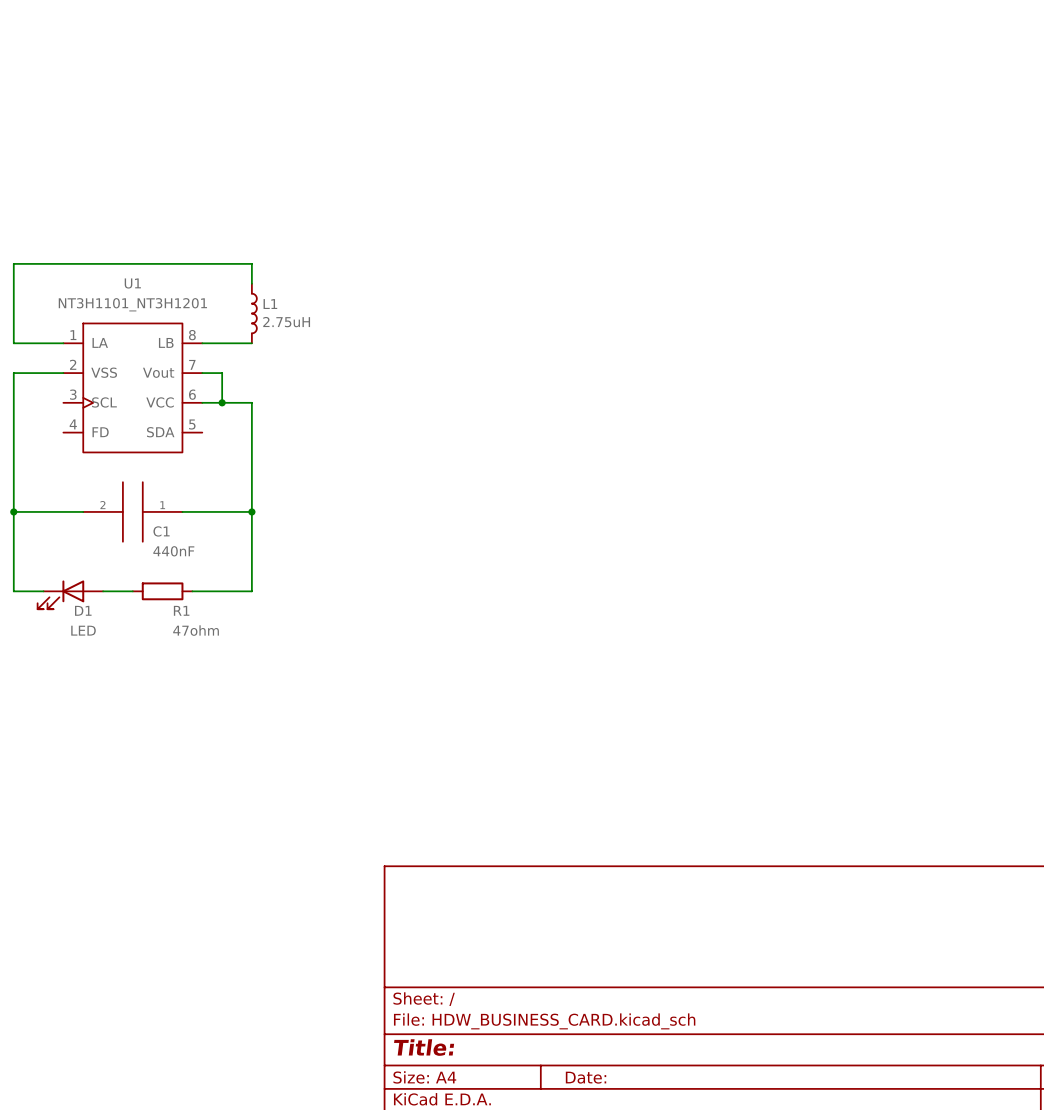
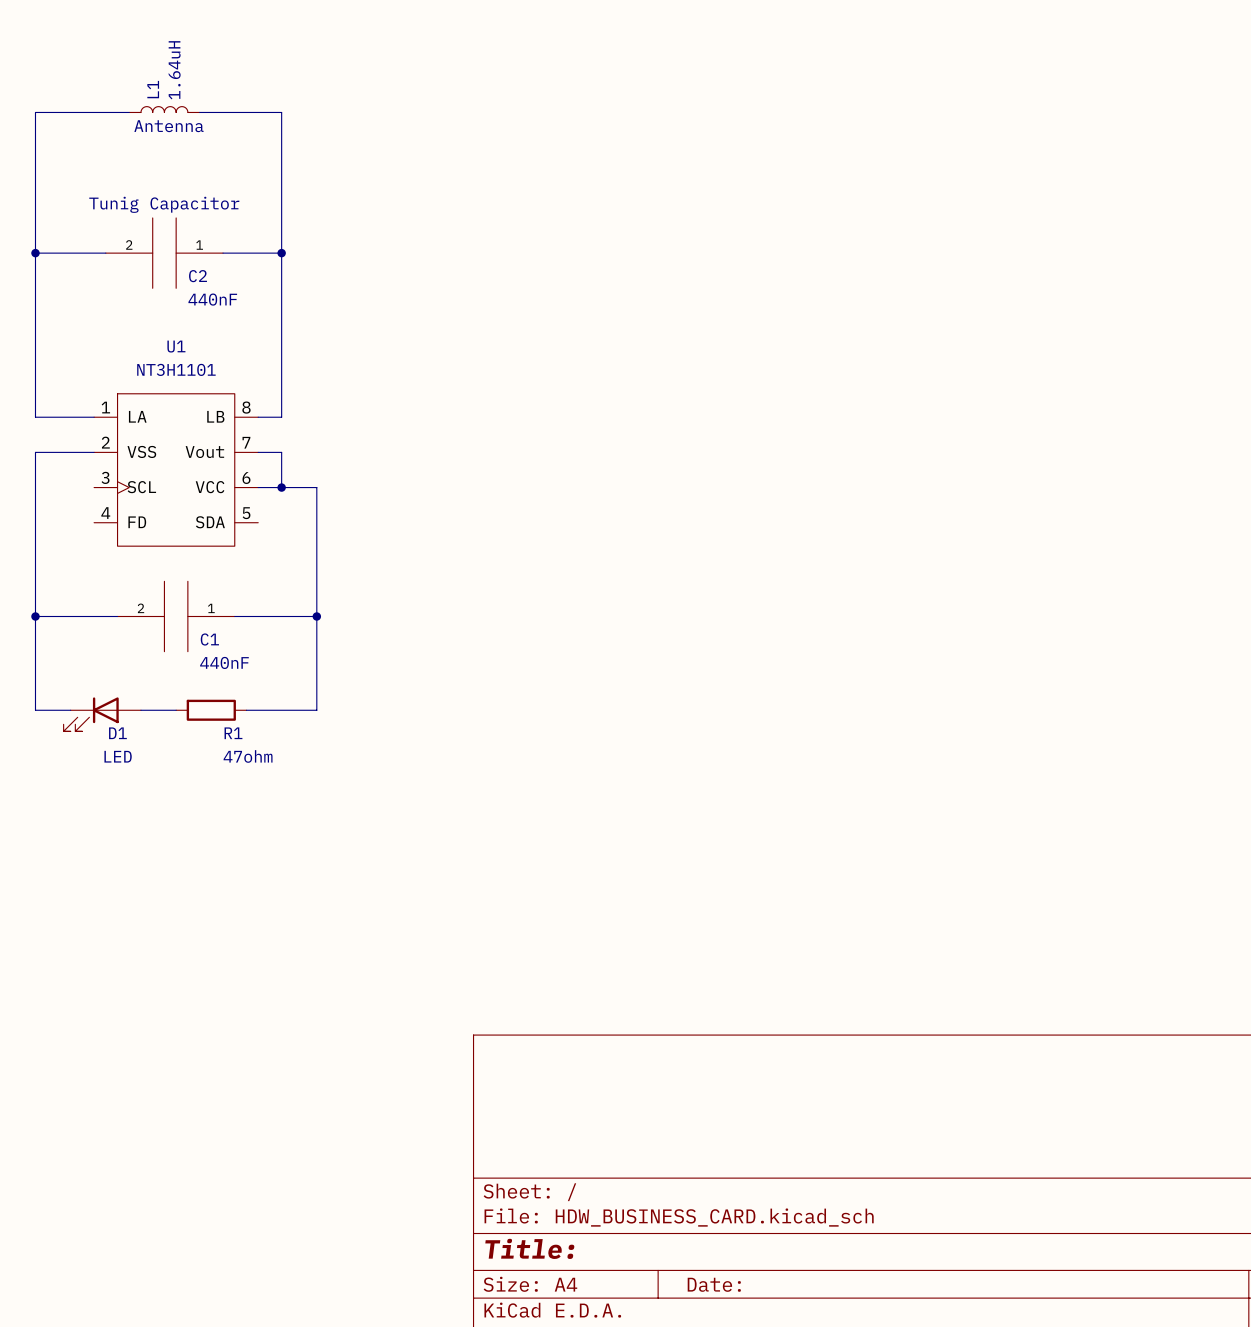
L1 text: none -> Antenna (168, 126)
wire: none -> (35, 253) (105, 253)
junction: none -> (35, 253)
C2: none -> 440nF (164, 253)
wire: none -> (223, 253) (281, 253)
junction: none -> (281, 253)
wire: (13, 263) (251, 263) (251, 283) -> (35, 323) (35, 112) (129, 112)
U1 value: NT3H1101_NT3H1201 (132, 304) -> NT3H1101 (176, 369)
L1 rotation: 0° (254, 313) -> 90° counterclockwise (164, 109)
L1 position: (254, 313) -> (164, 109)
L1 value: 2.75uH (286, 322) -> 1.64uH (174, 70)
wire: (222, 343) (251, 343) -> (281, 417) (281, 112) (199, 112)

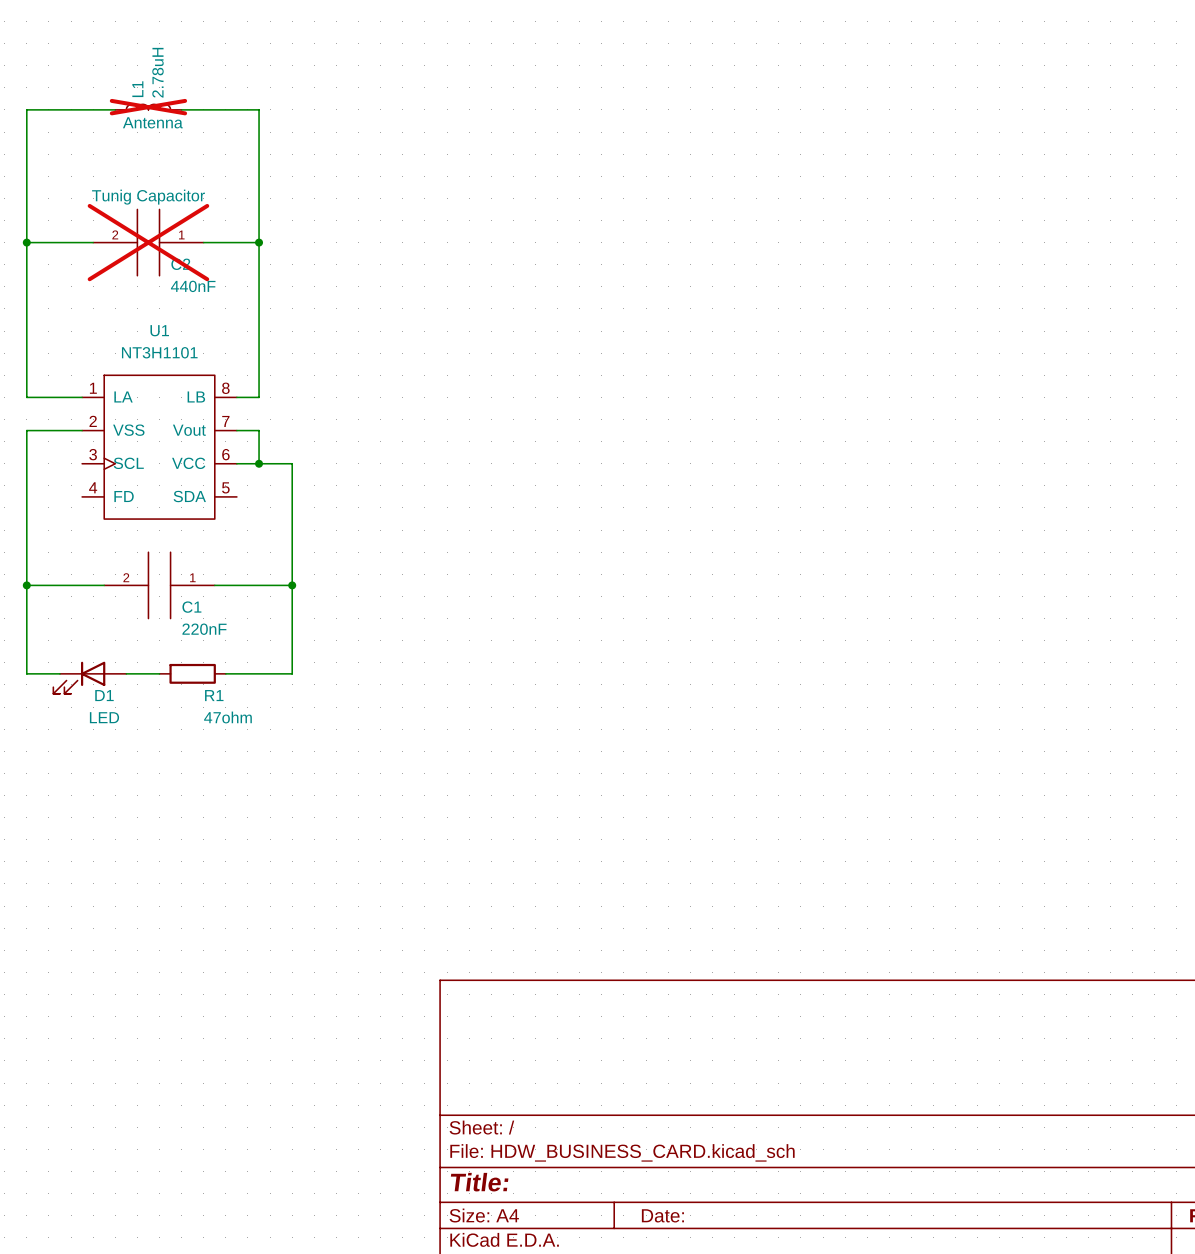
L1 value: 1.64uH (174, 70) -> 2.78uH (157, 72)
L1 do-not-place cross: none -> (148, 107)
C2 do-not-place cross: none -> (148, 242)
C1 value: 440nF (224, 662) -> 220nF (204, 629)

